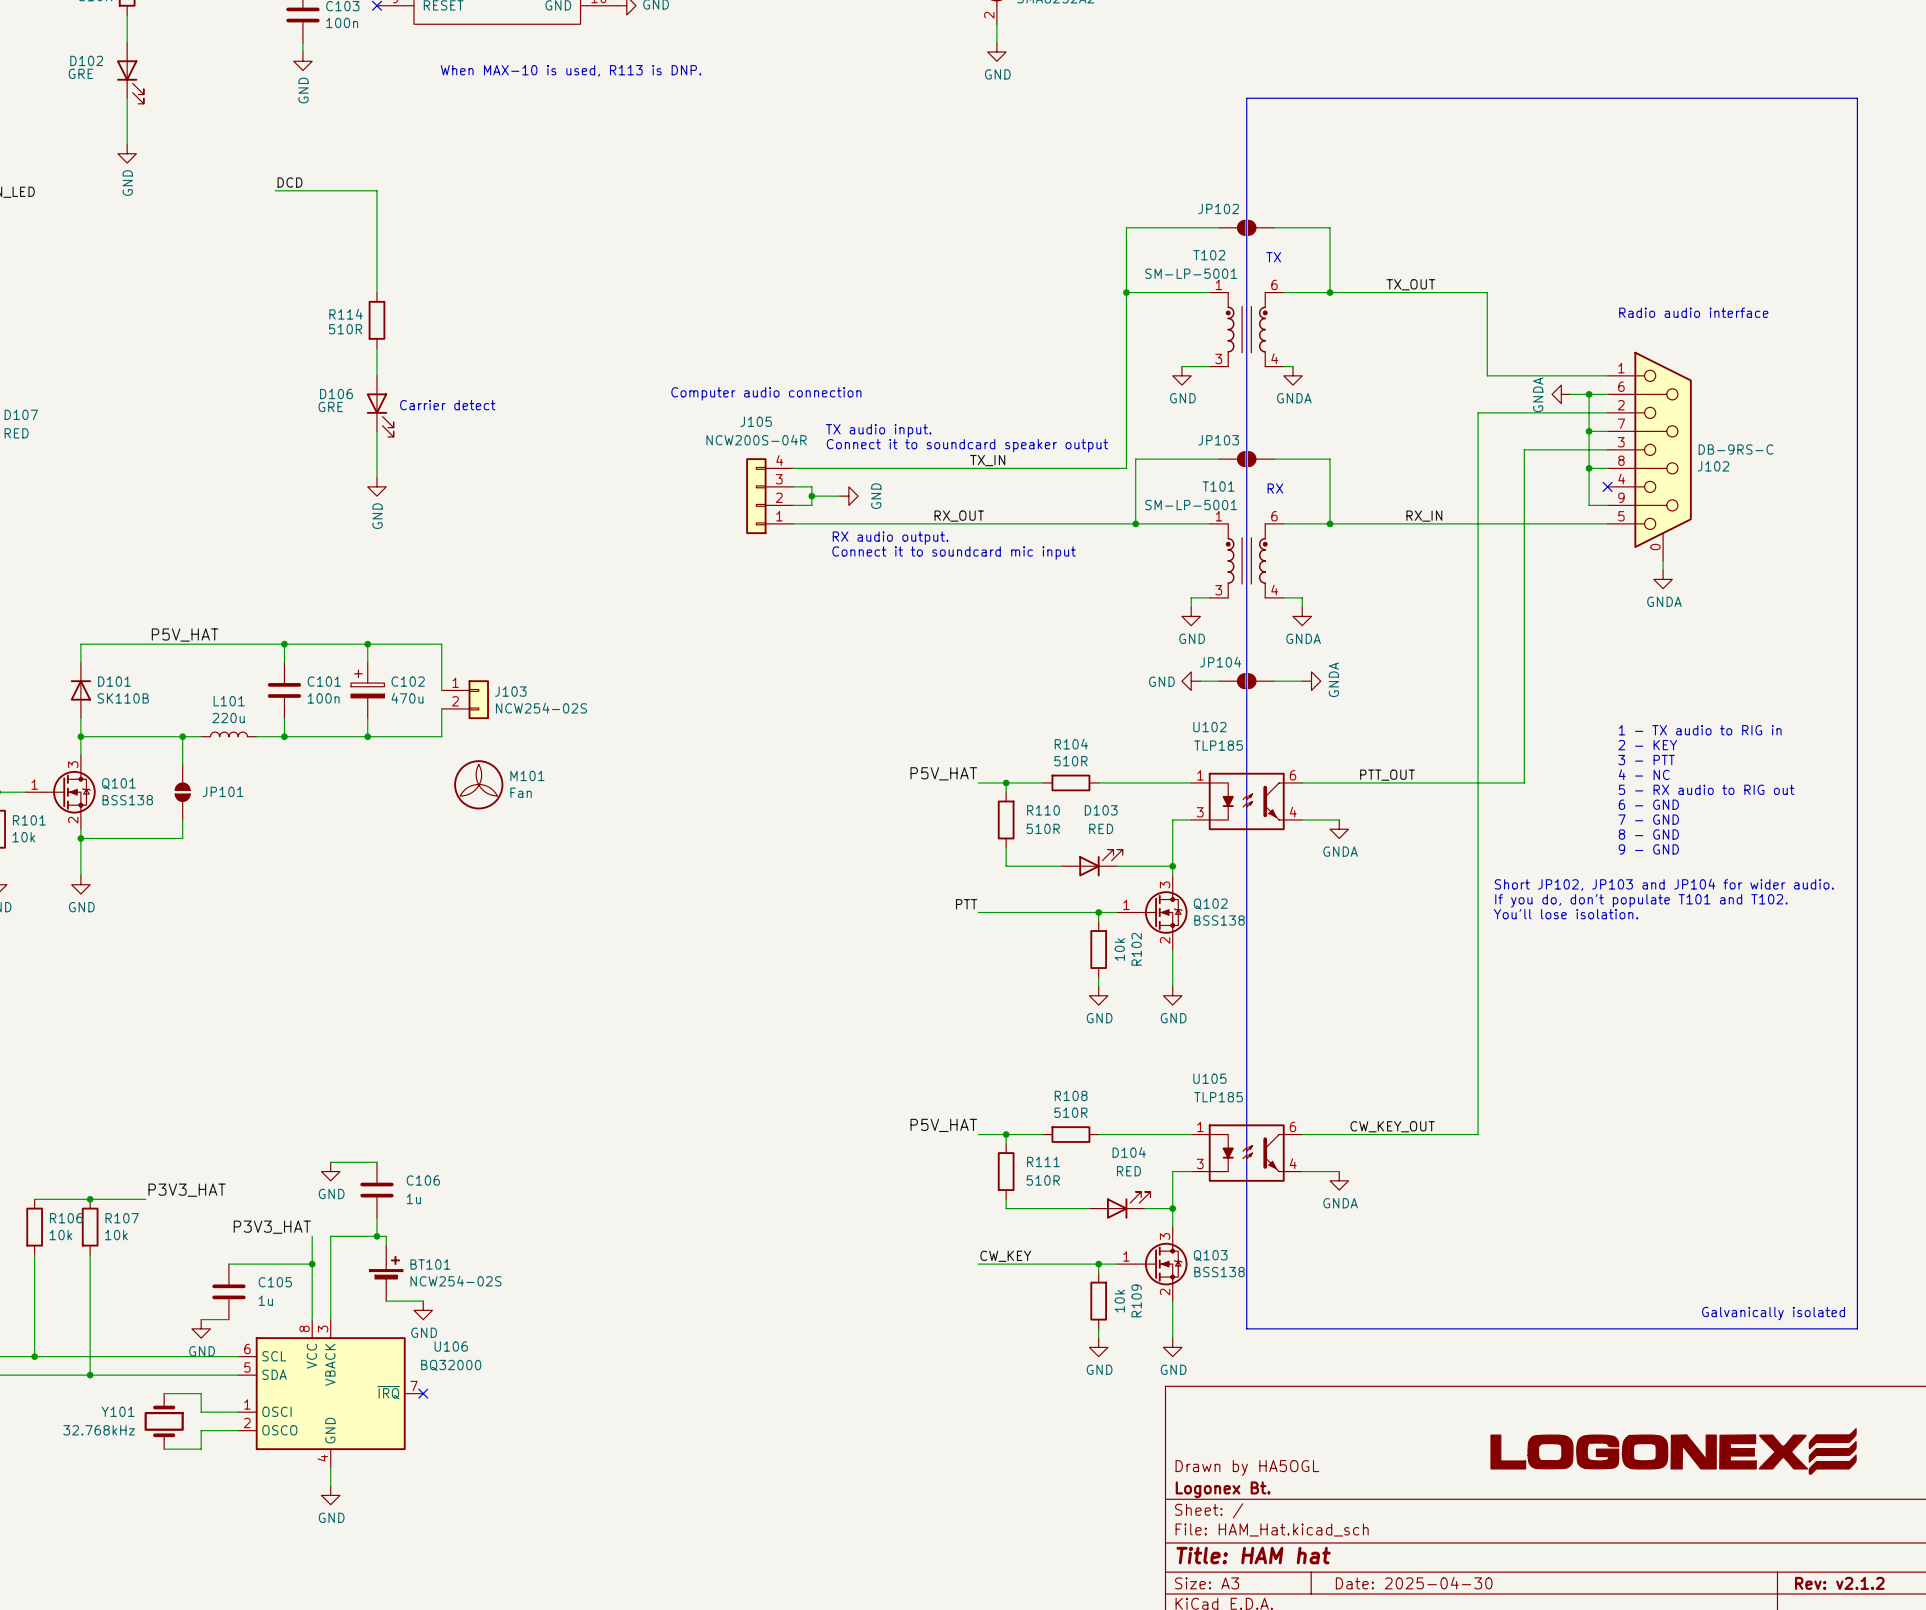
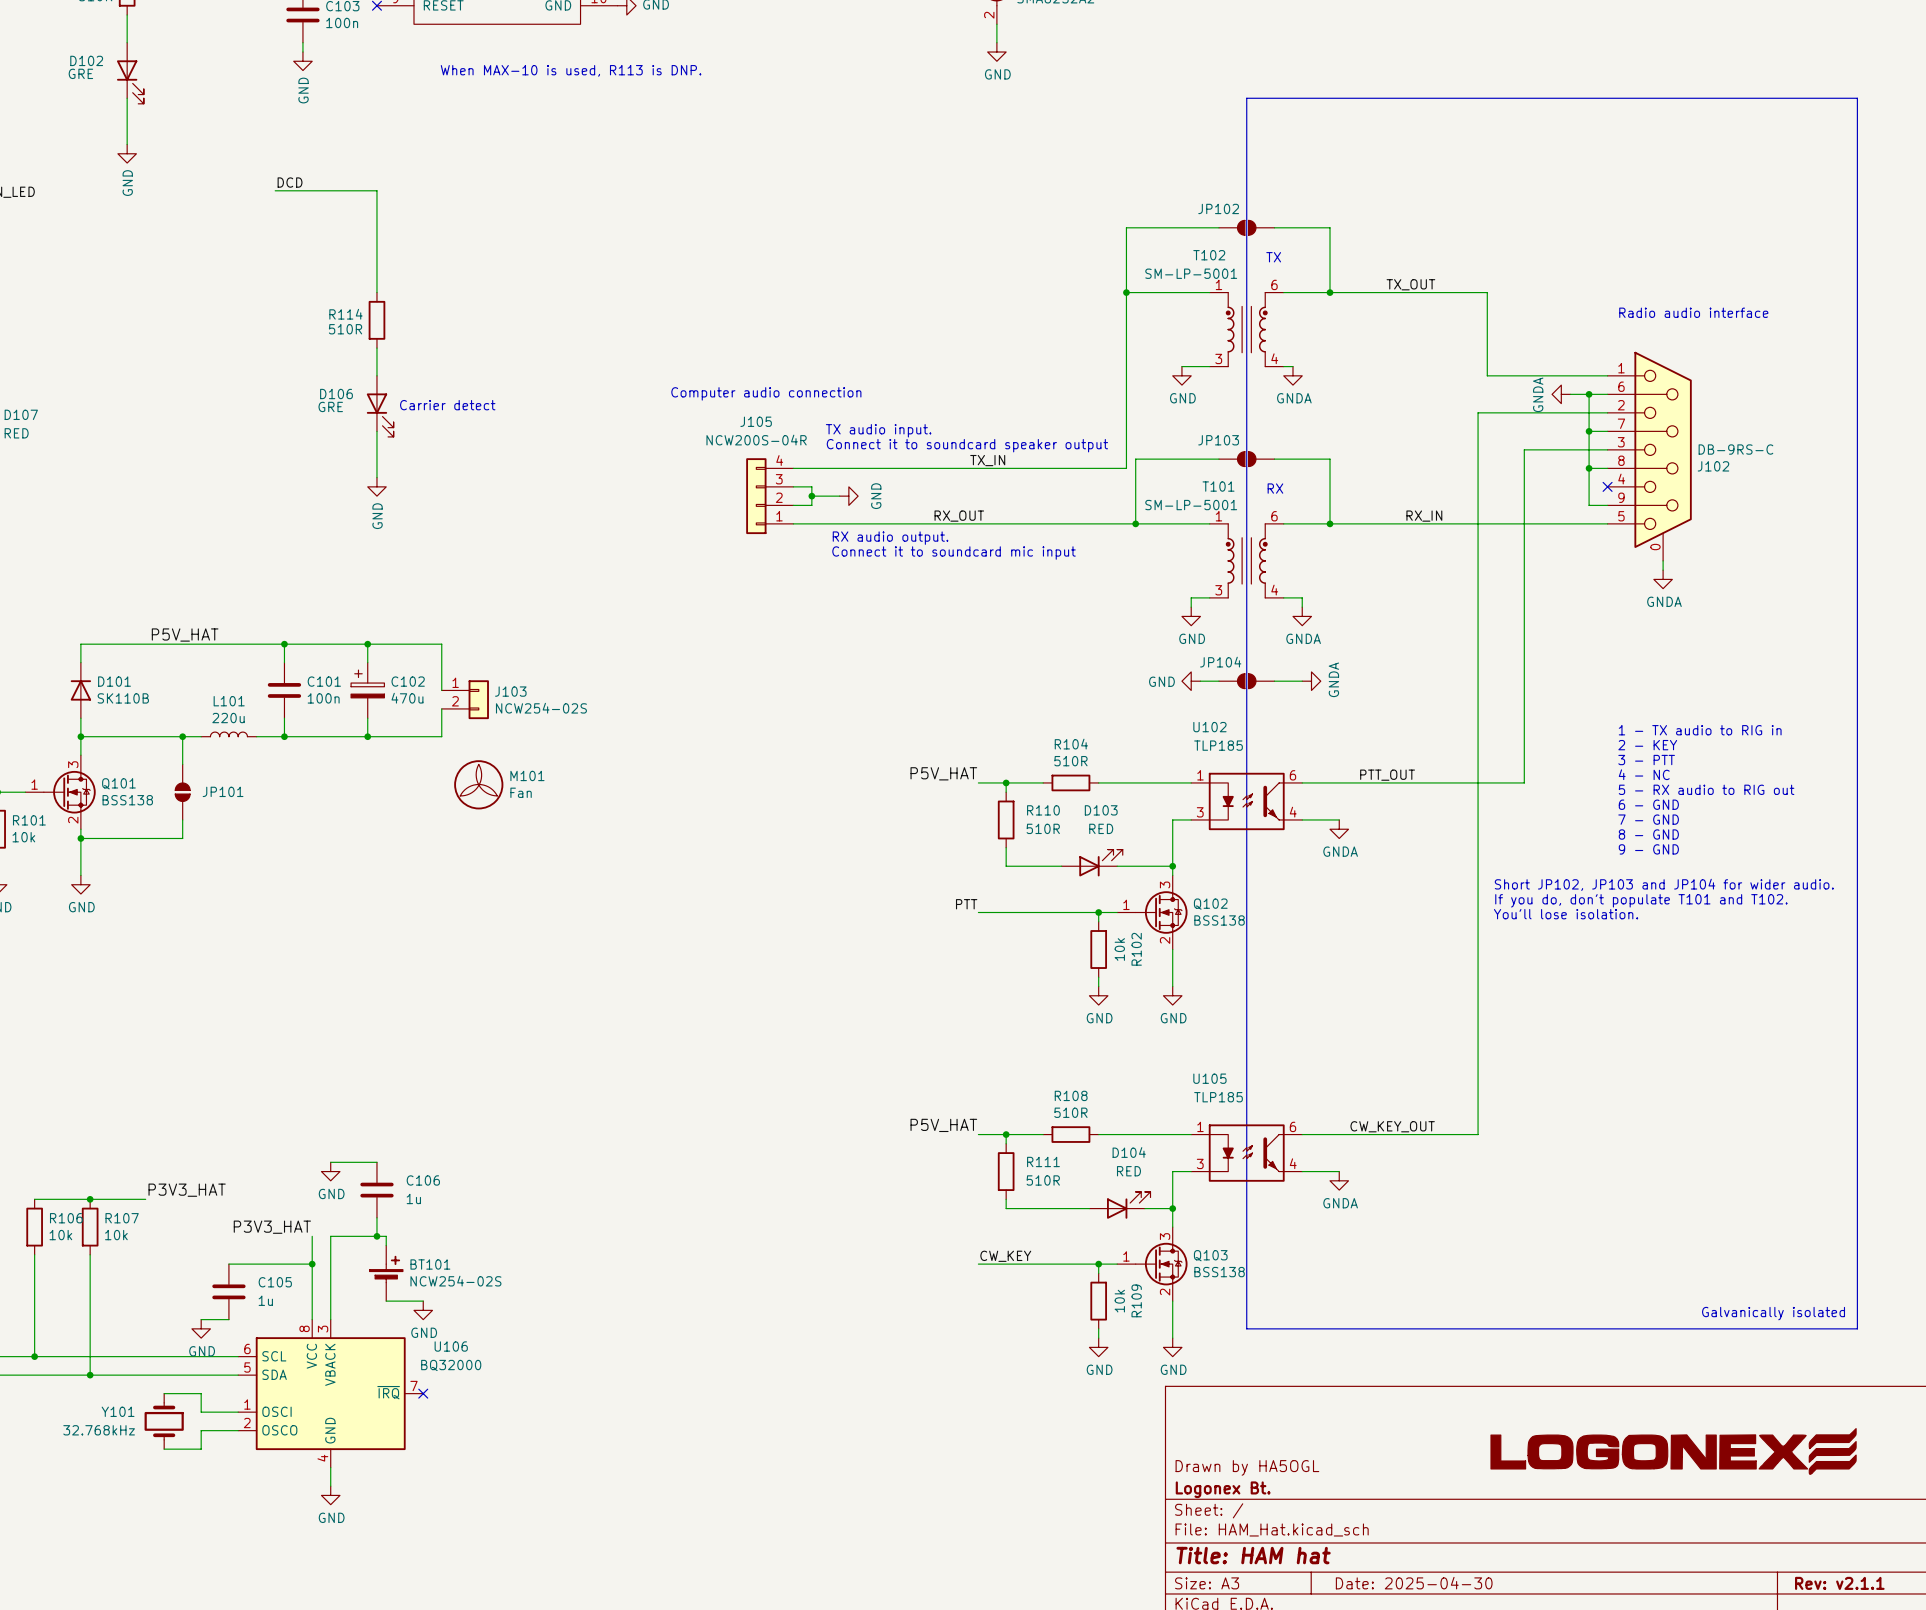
title block: Rev: v2.1.2 (1839, 1583) -> Rev: v2.1.1 (1839, 1583)

